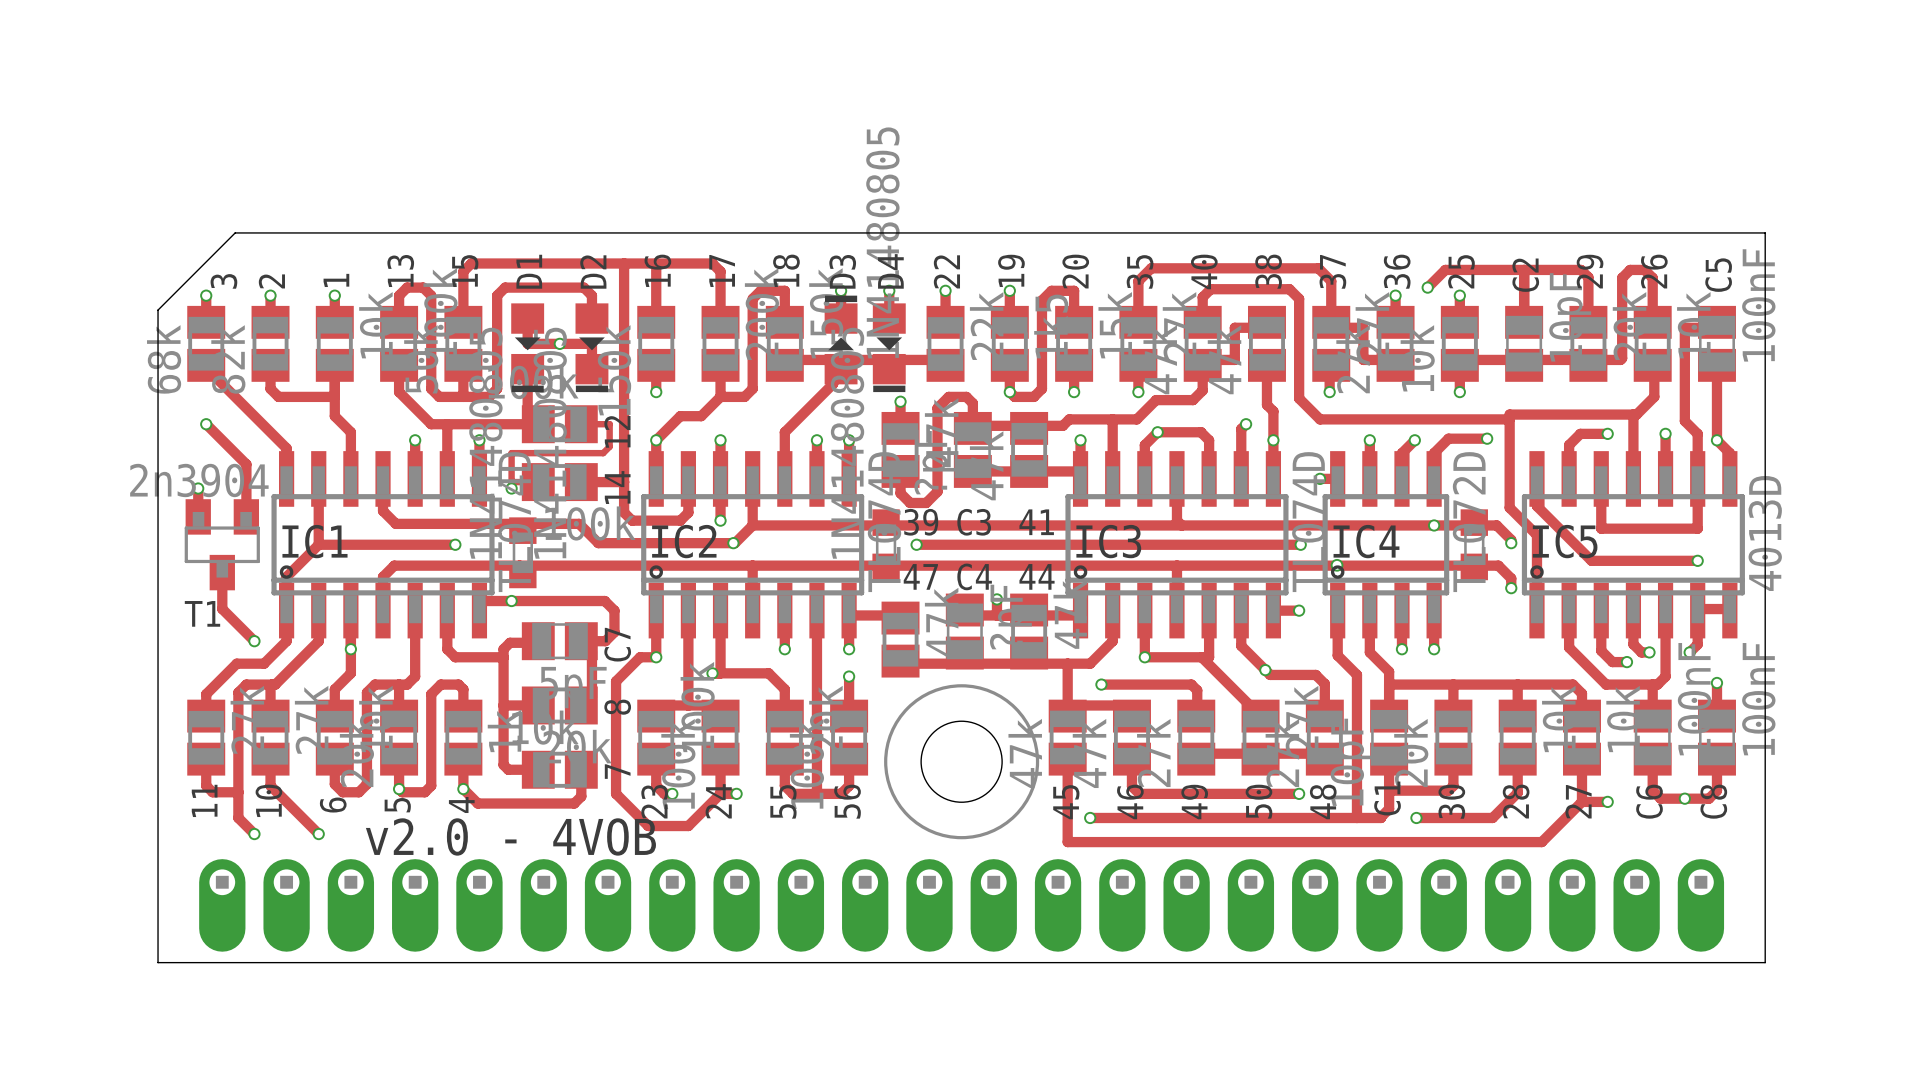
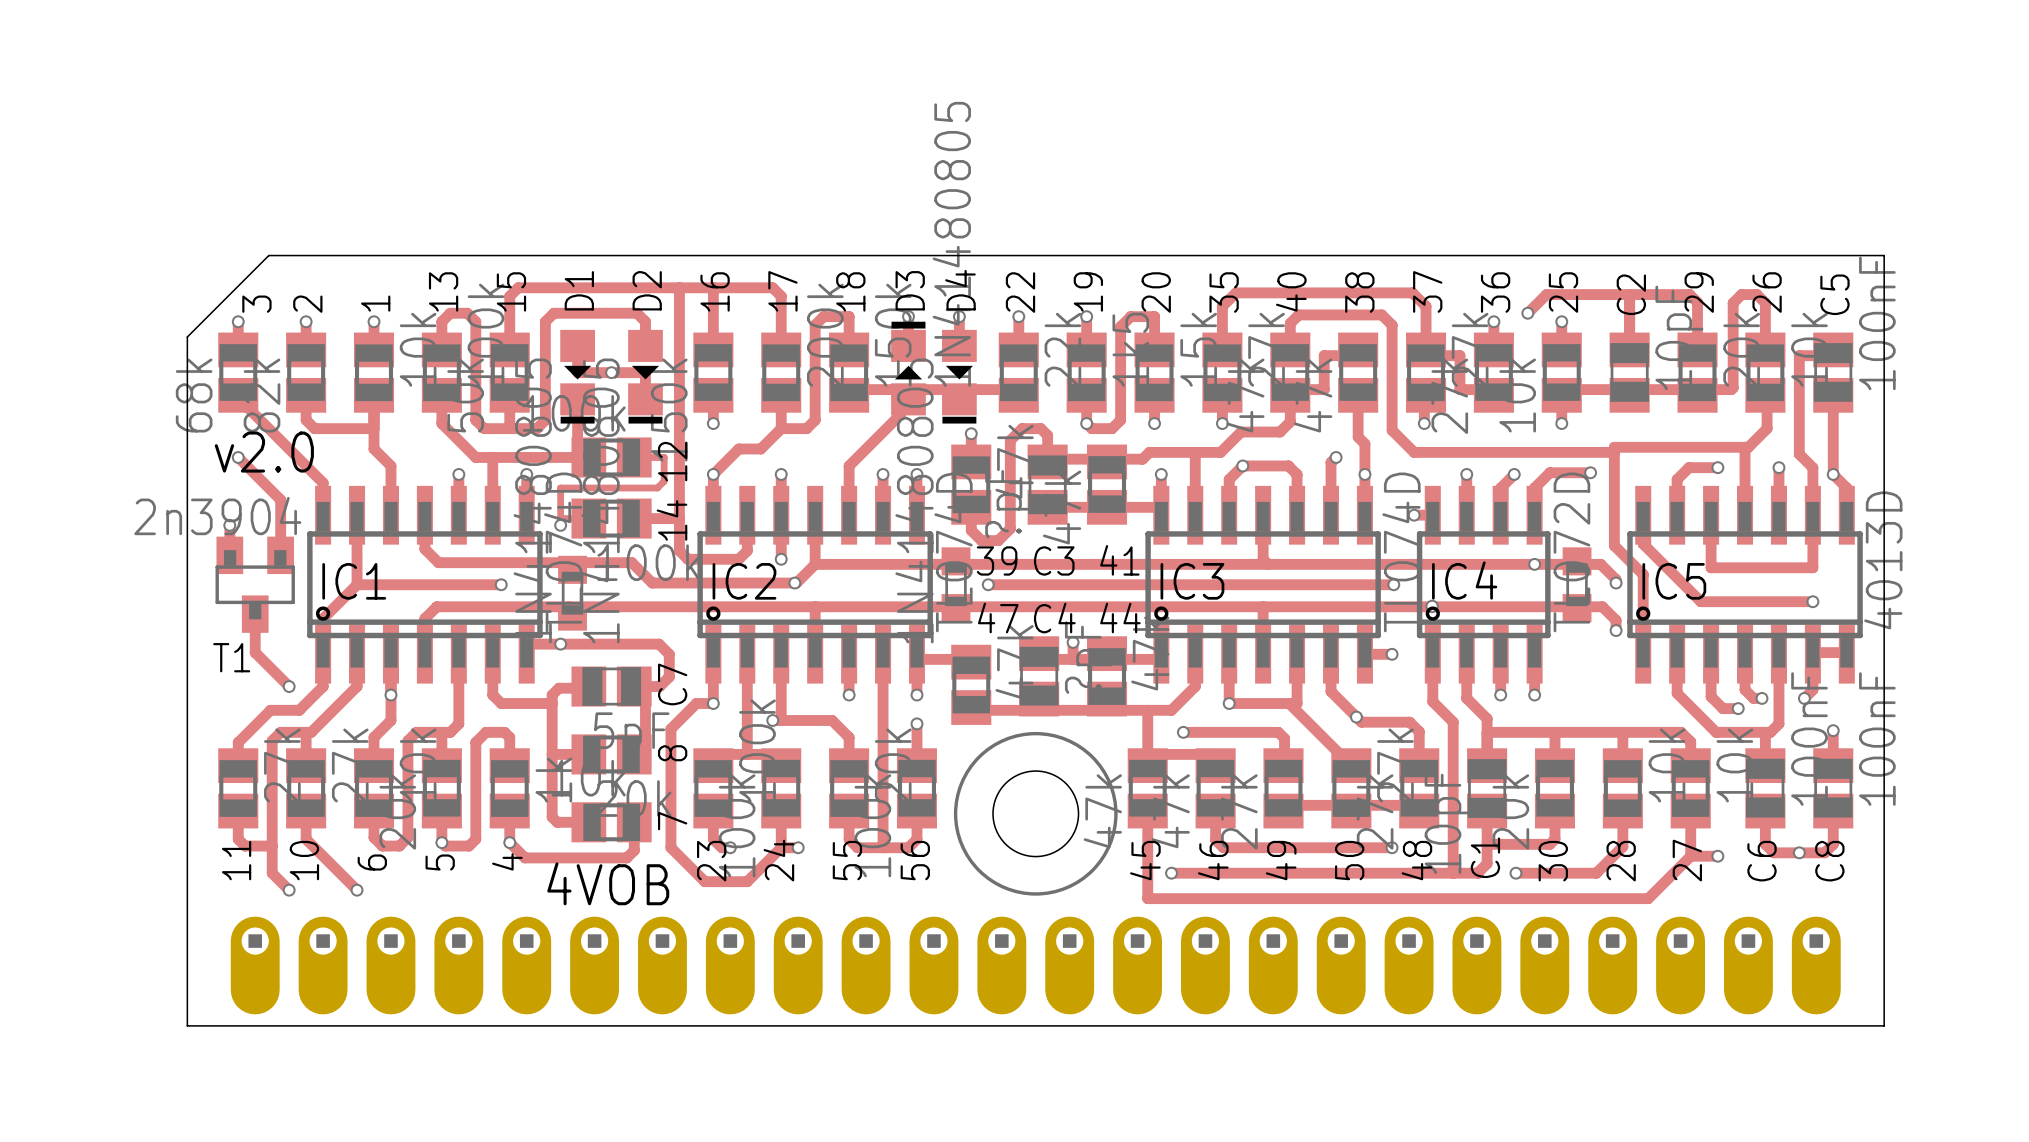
text: none -> v2.0 (264, 452)
text: none -> 4VOB (608, 883)
text: v2.0 - 4VOB (510, 836) -> none

